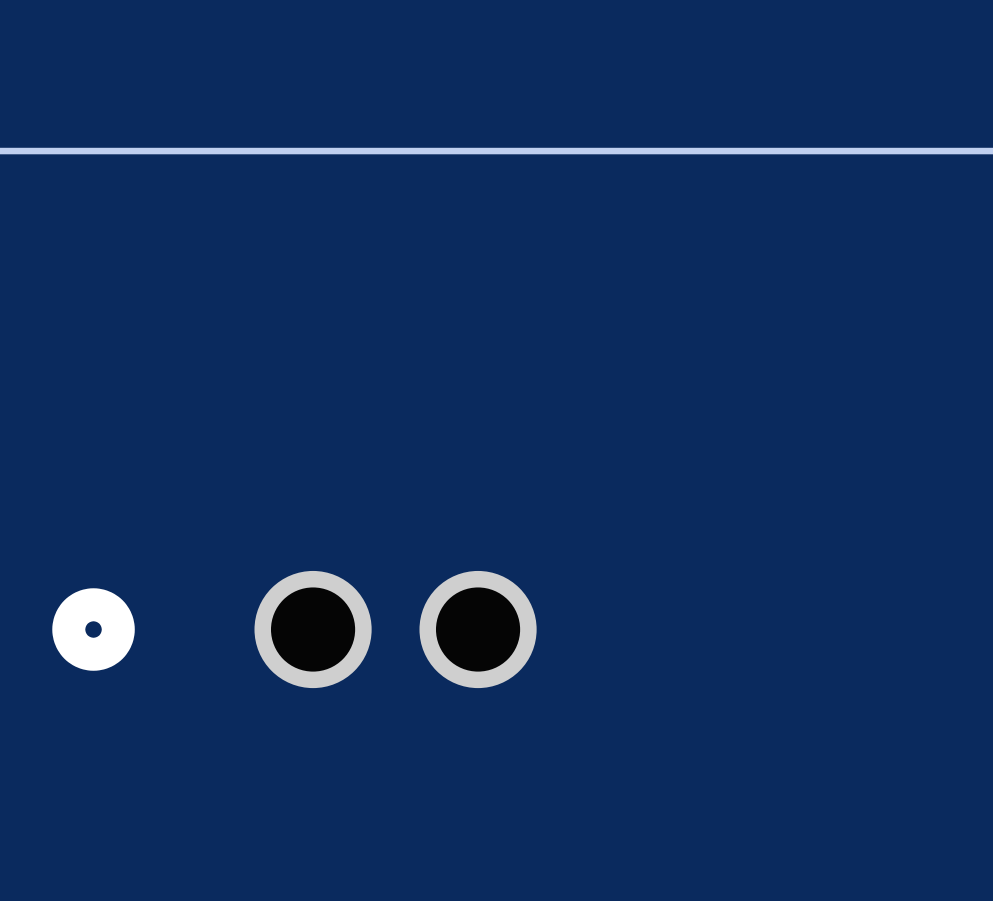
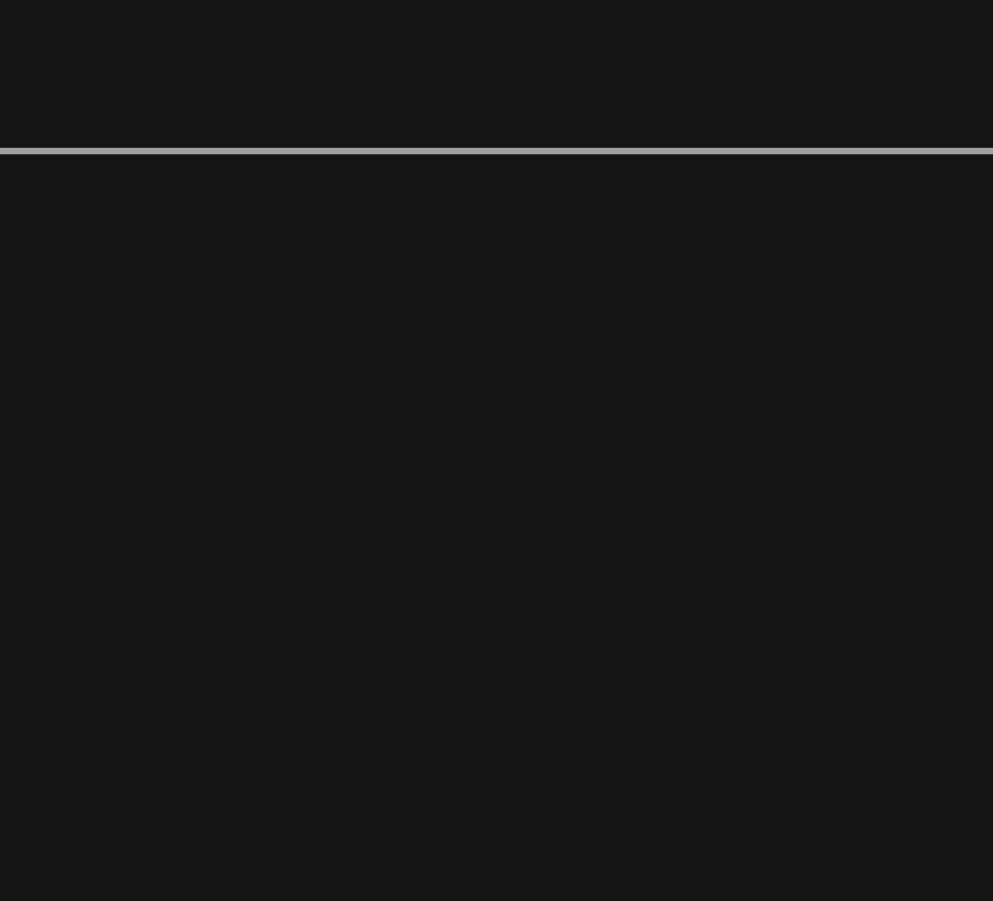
part: (294, 629) -> none

